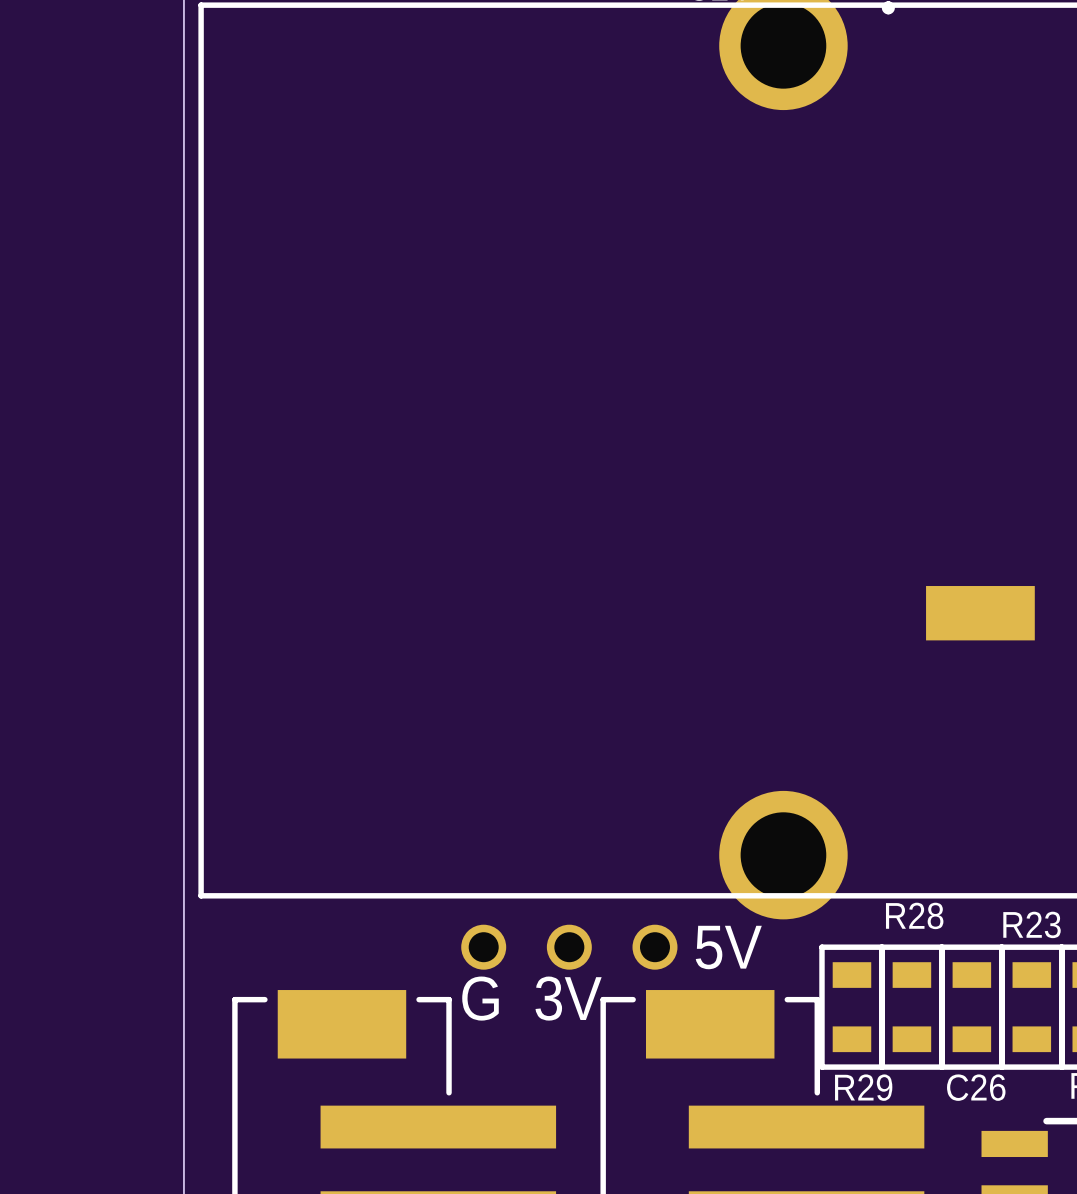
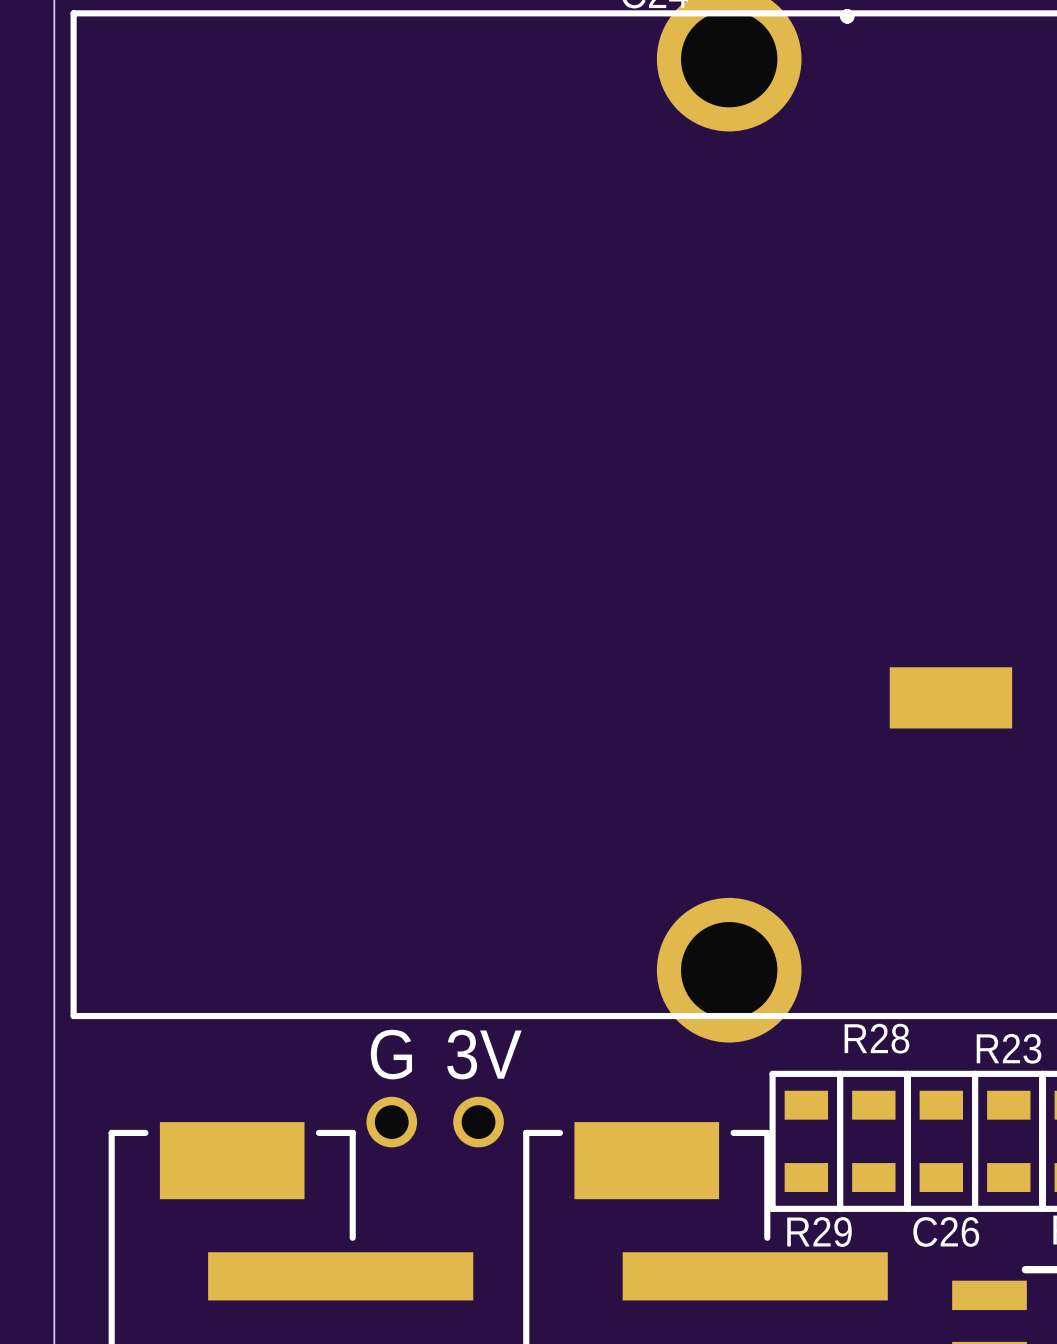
part position: (483, 947) -> (391, 1122)
part position: (569, 947) -> (478, 1122)
part: (654, 947) -> none
text: 5V (728, 947) -> none
text position: G (480, 998) -> G (391, 1054)
text position: 3V (568, 998) -> 3V (484, 1054)

